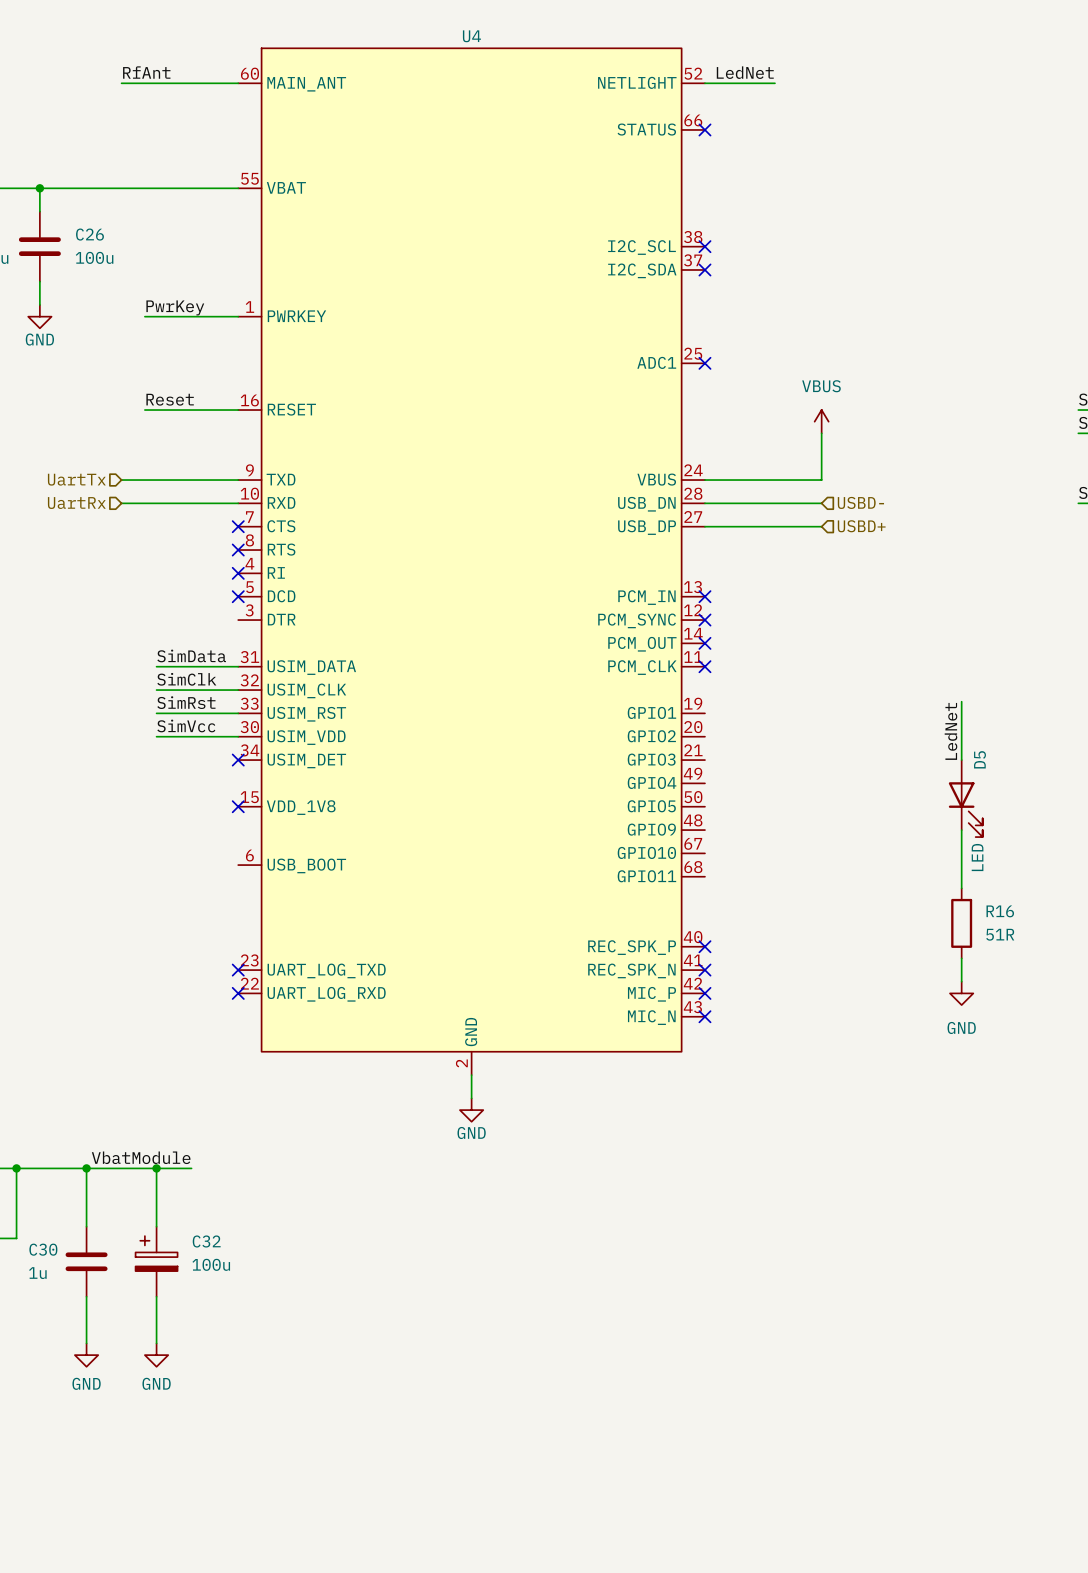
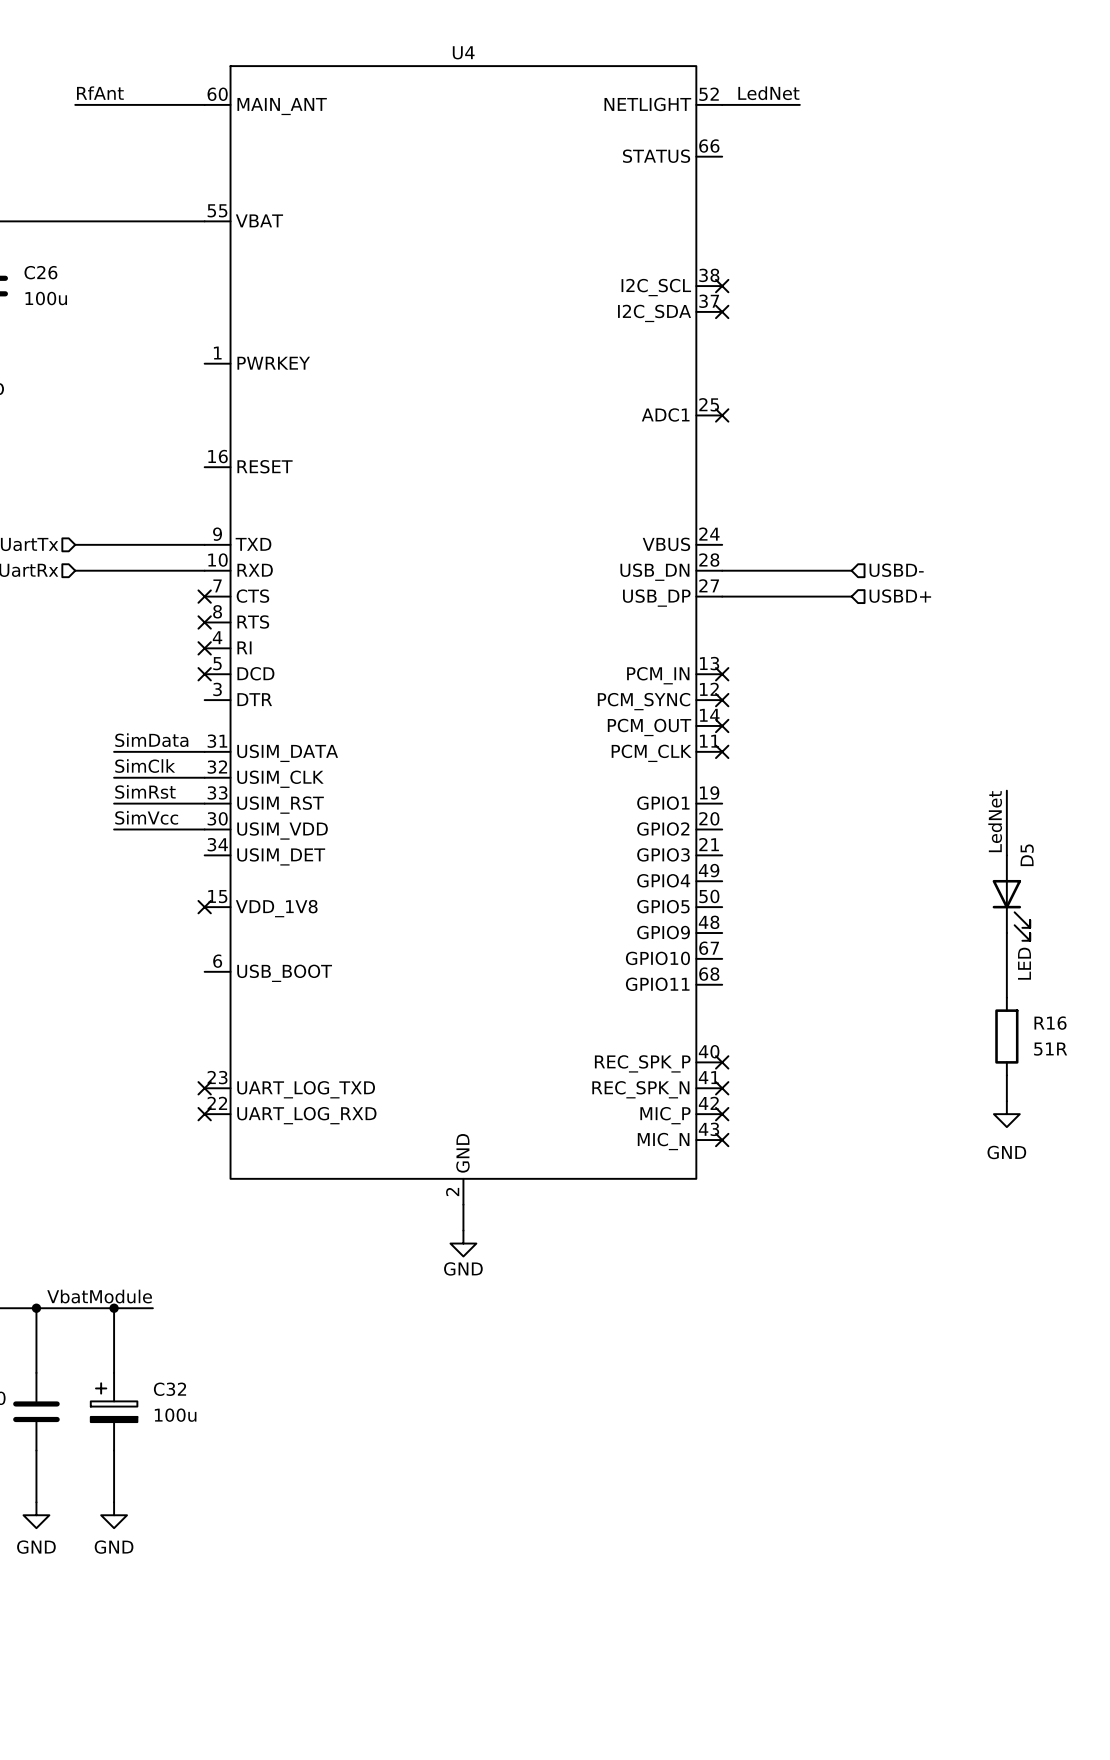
no-connect mark: (704, 129) -> none
label: PwrKey (175, 307) -> none
wire: (144, 316) (238, 316) -> none
label: Reset (170, 399) -> none
wire: (144, 410) (238, 410) -> none
power symbol: VBUS (821, 421) -> none
wire: (821, 433) (821, 480) (704, 480) -> none
no-connect mark: (238, 760) -> none

